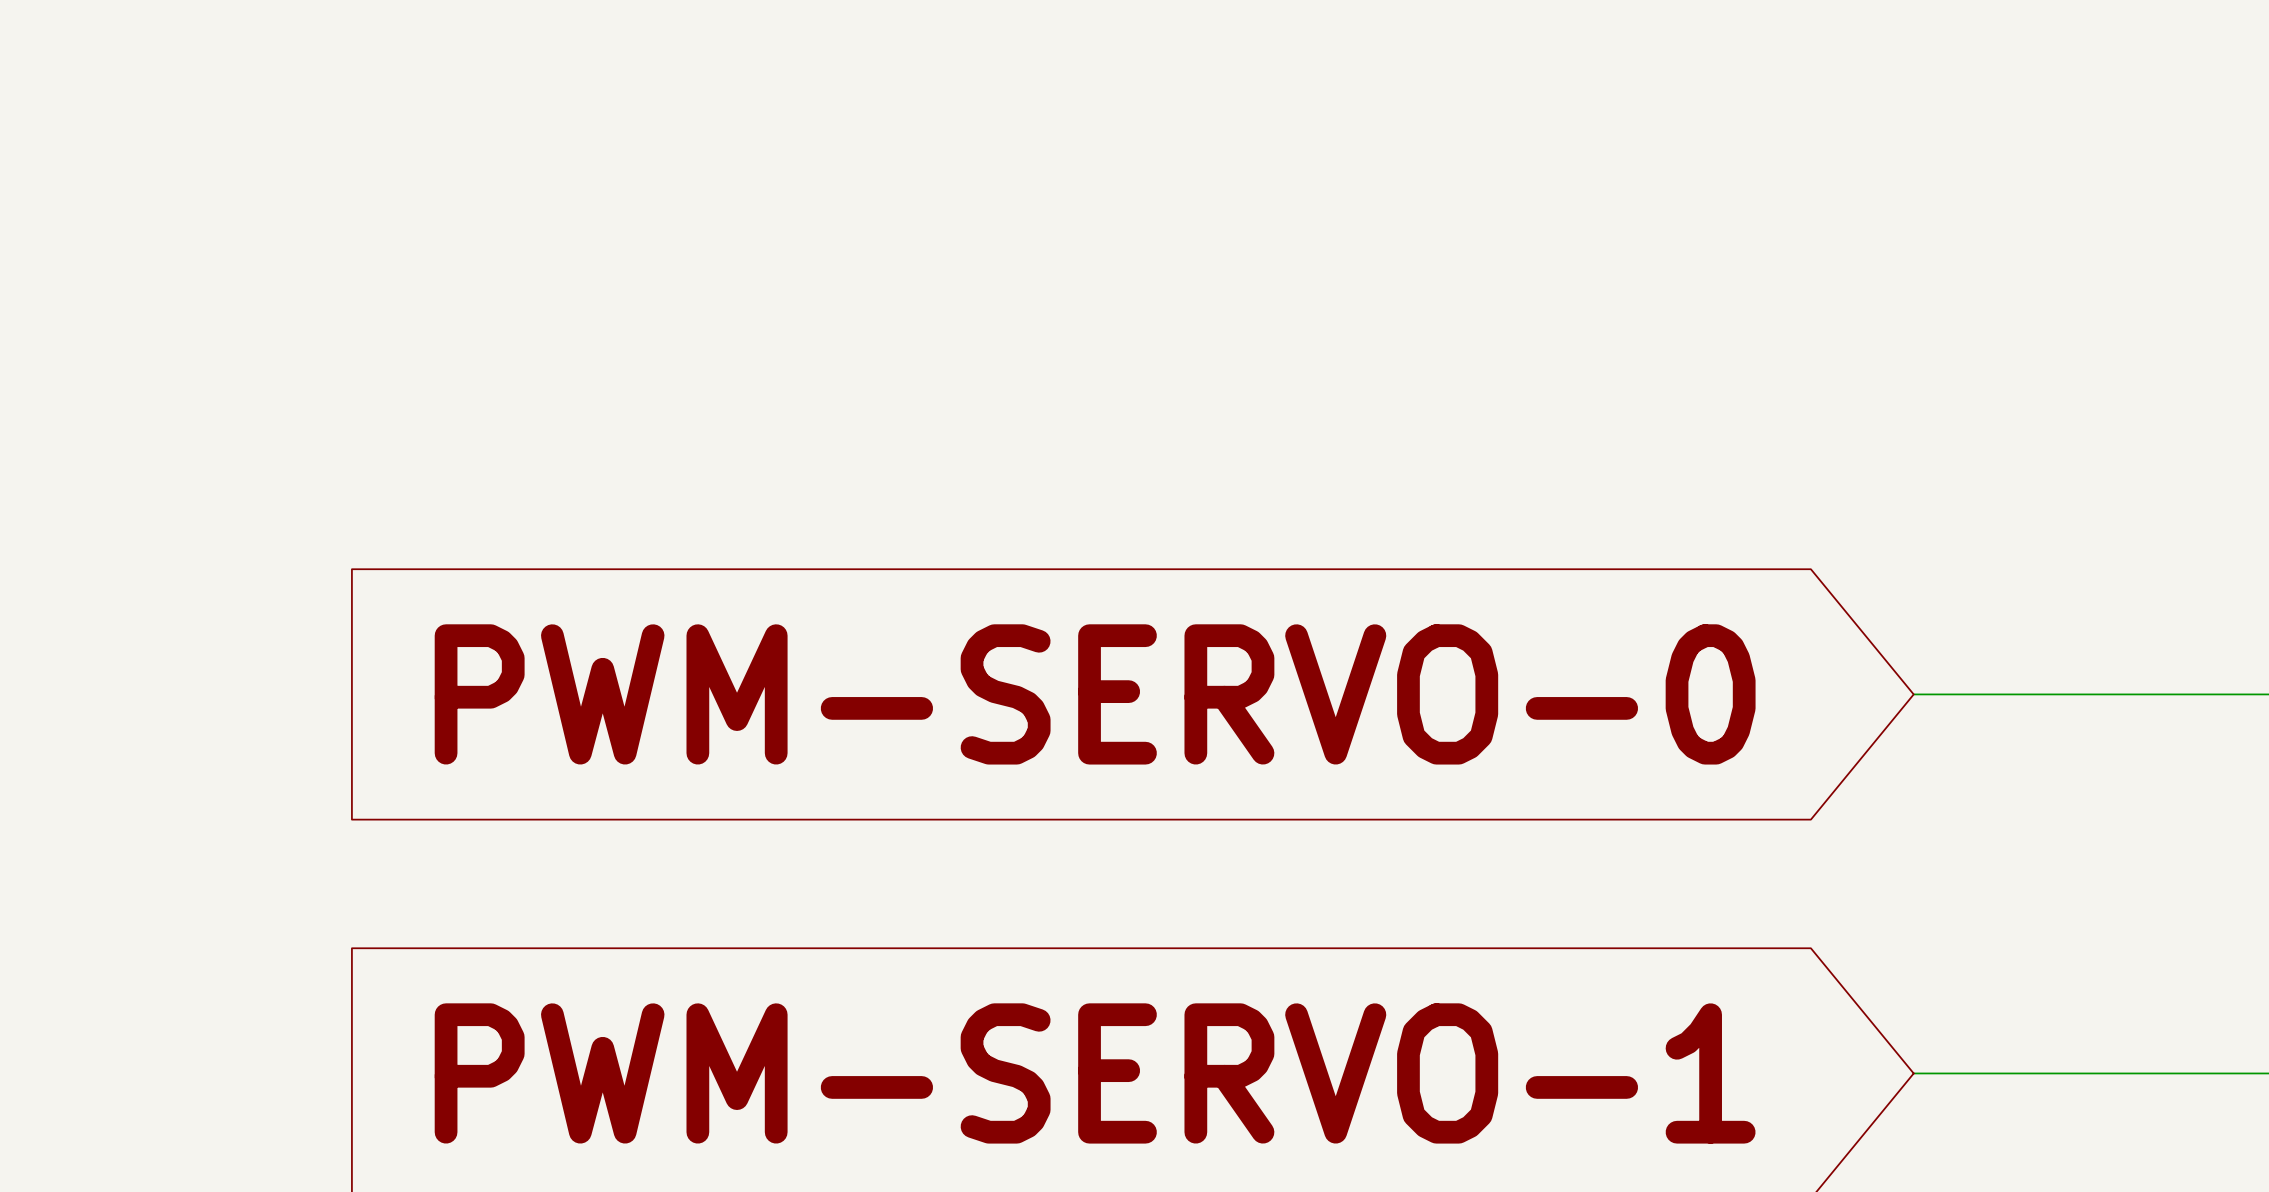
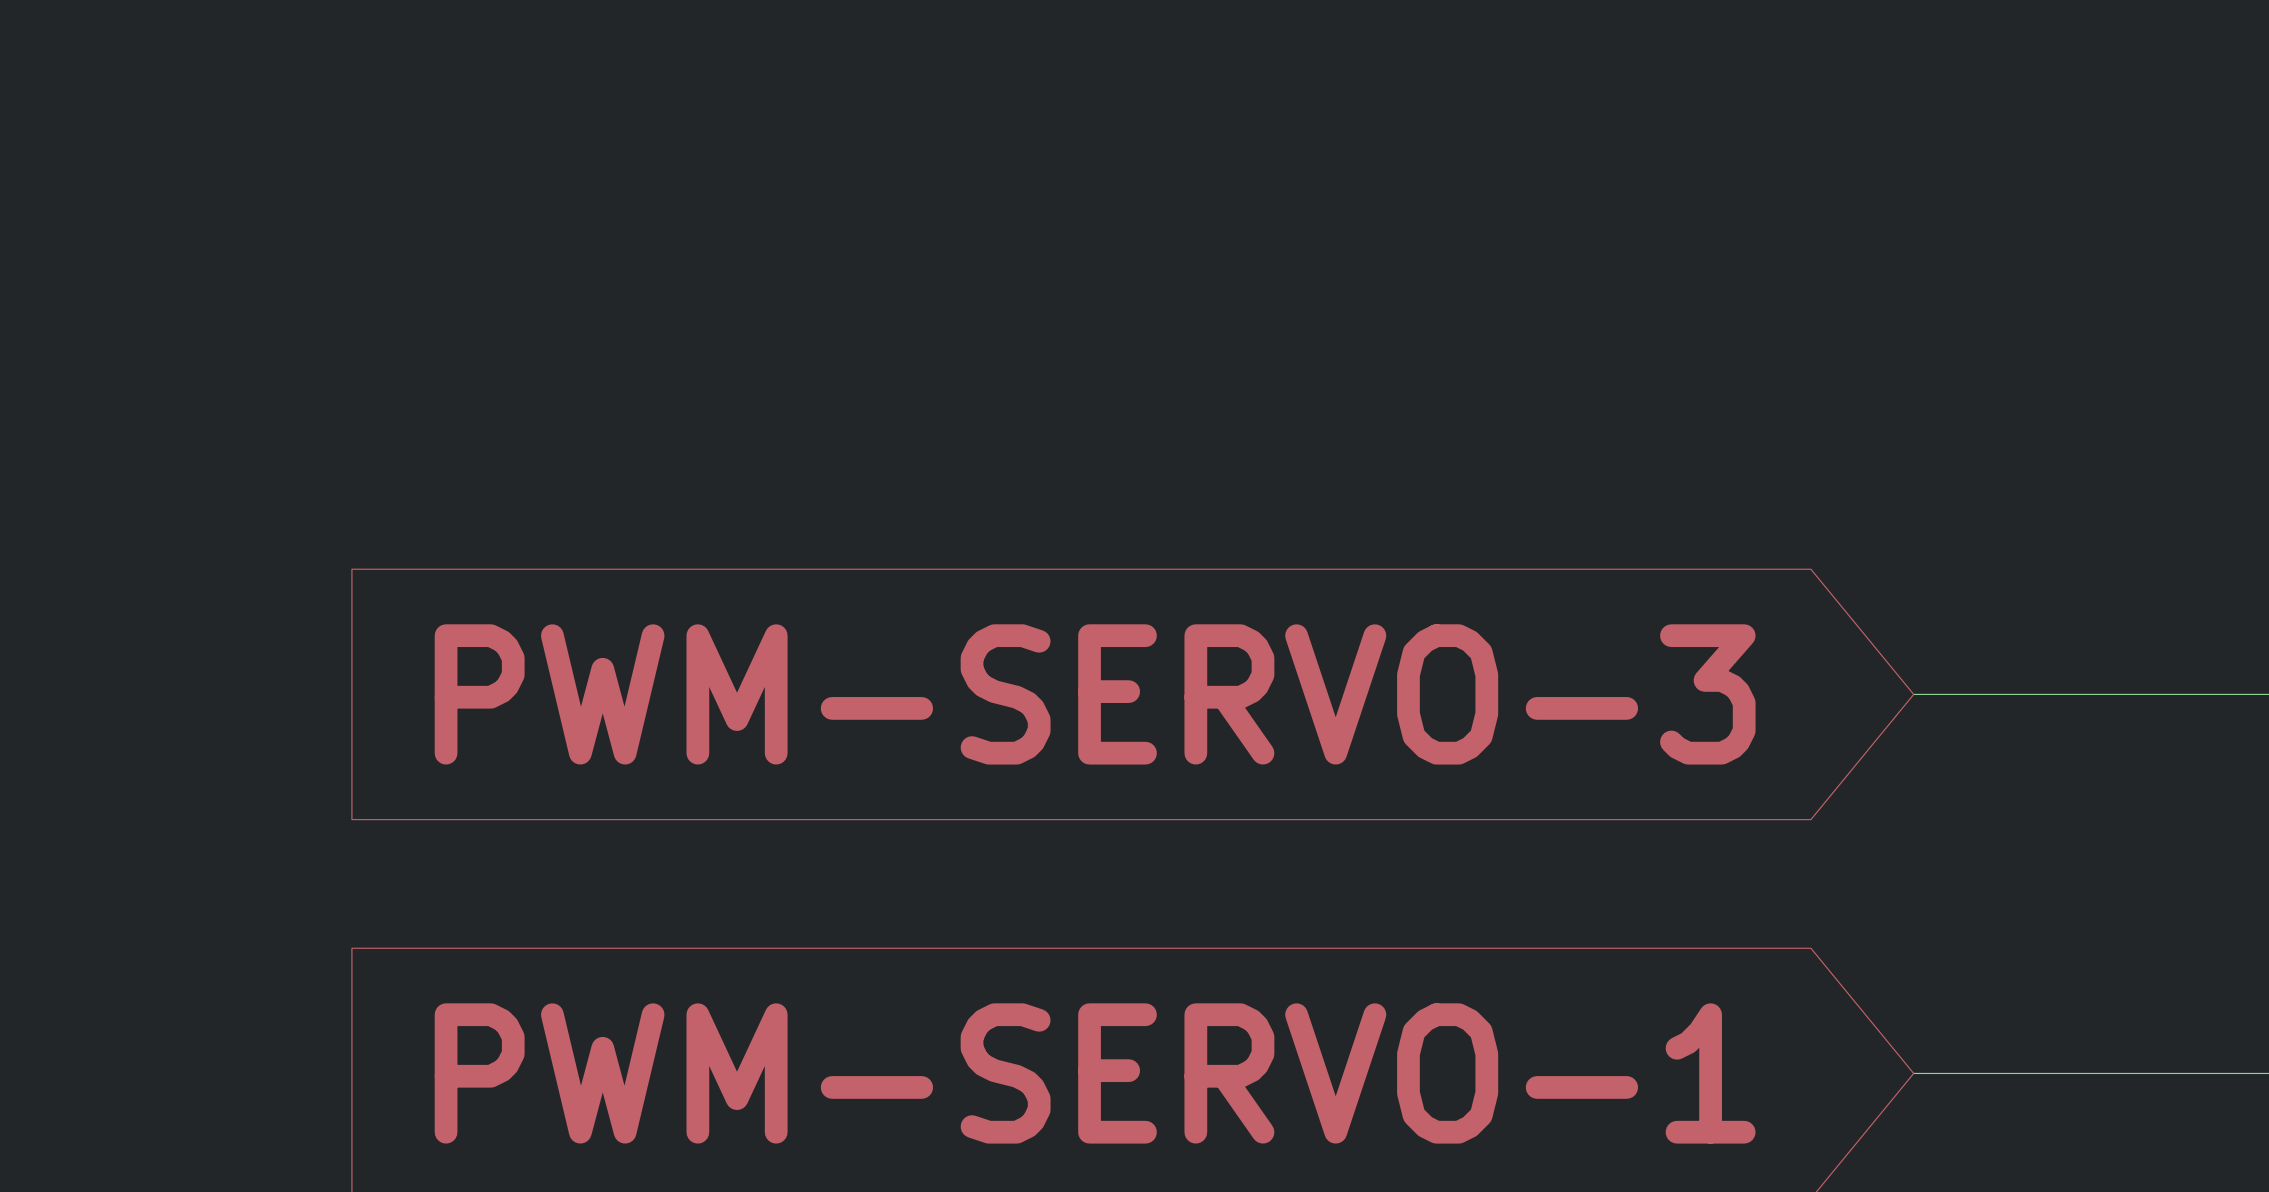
global label: PWM-SERVO-0 (1095, 694) -> PWM-SERVO-3 (1095, 694)

